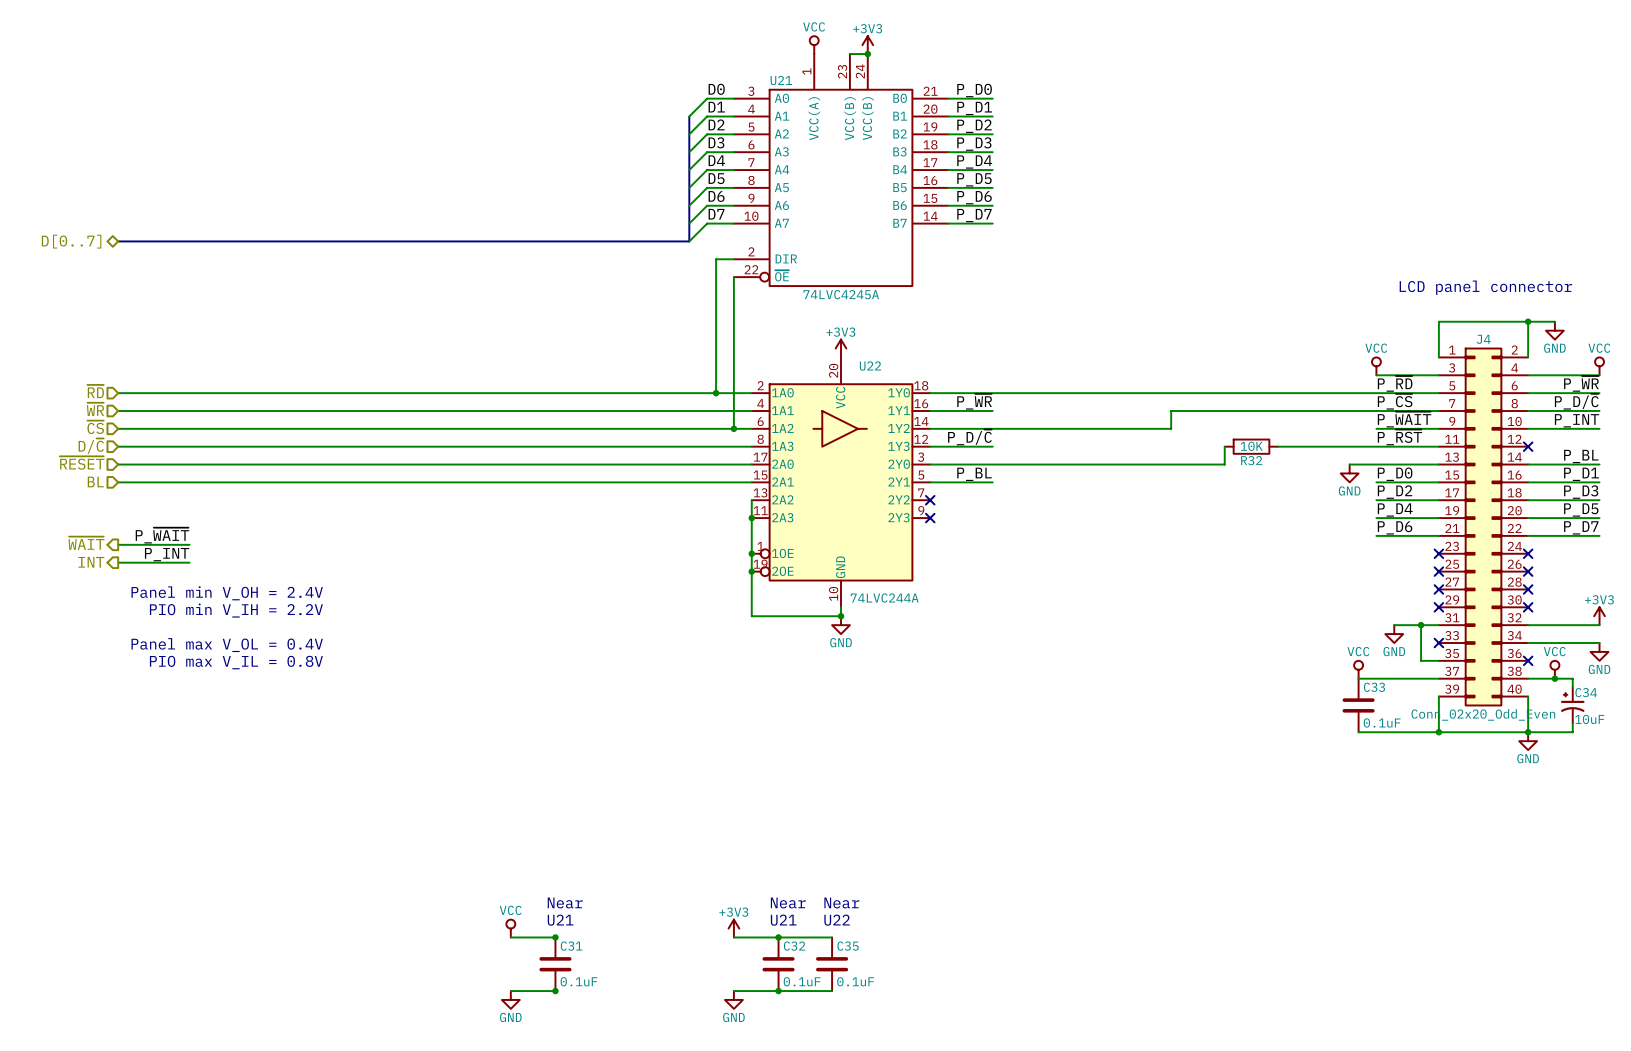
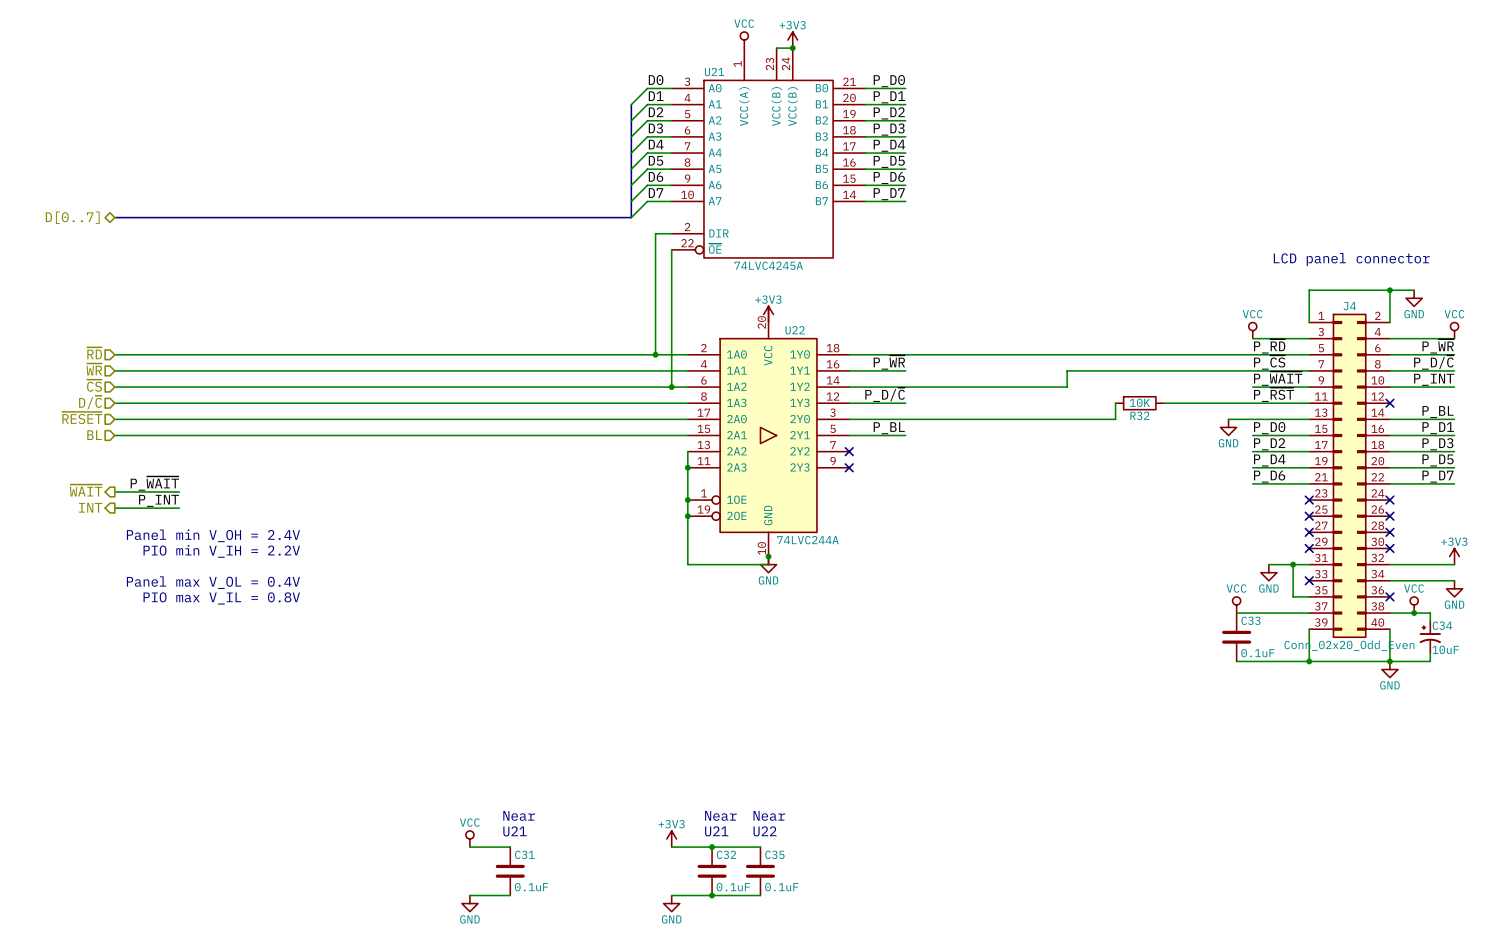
U22 symbol: [751, 357, 931, 608] -> [687, 306, 850, 565]
wire: (841, 607) (841, 616) (751, 616) -> (768, 564) (687, 564) (687, 556)
junction: (555, 937) -> none
junction: (555, 991) -> none

